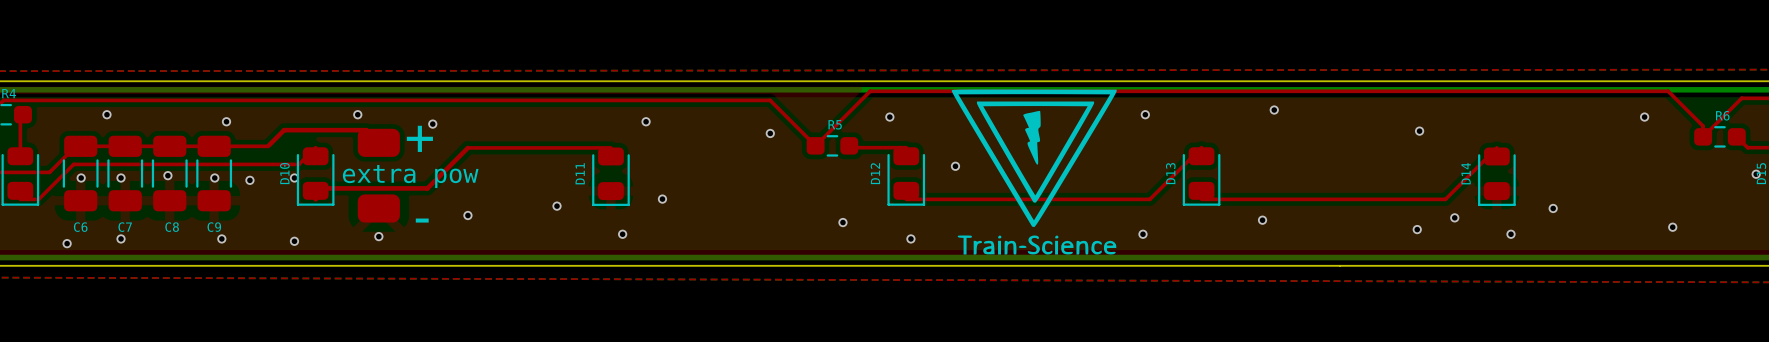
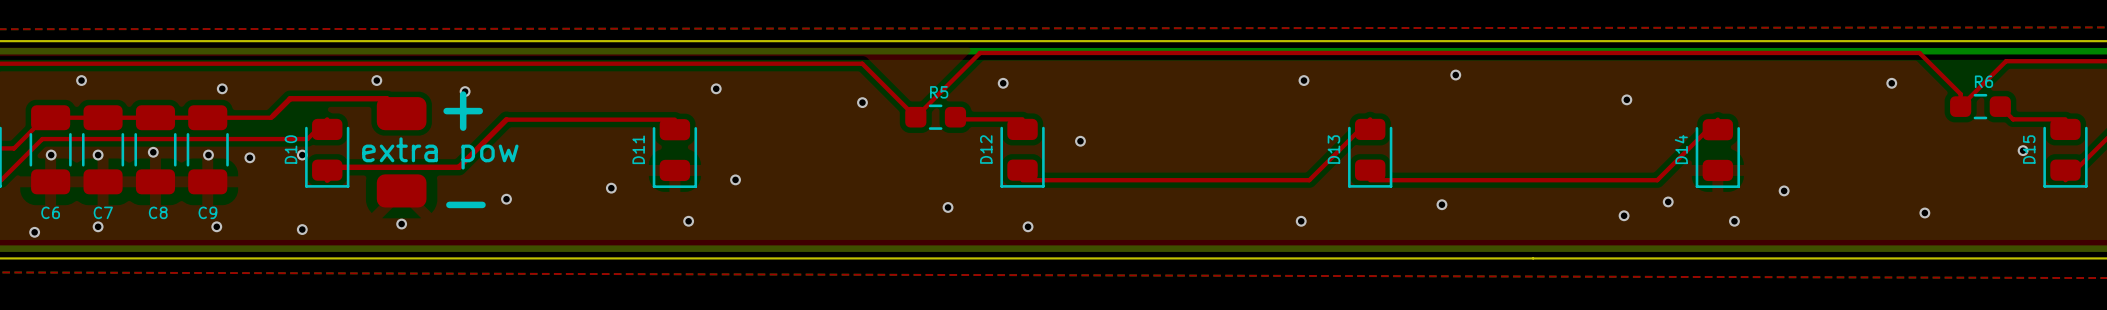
drawing: [951, 89, 1117, 255] -> none

